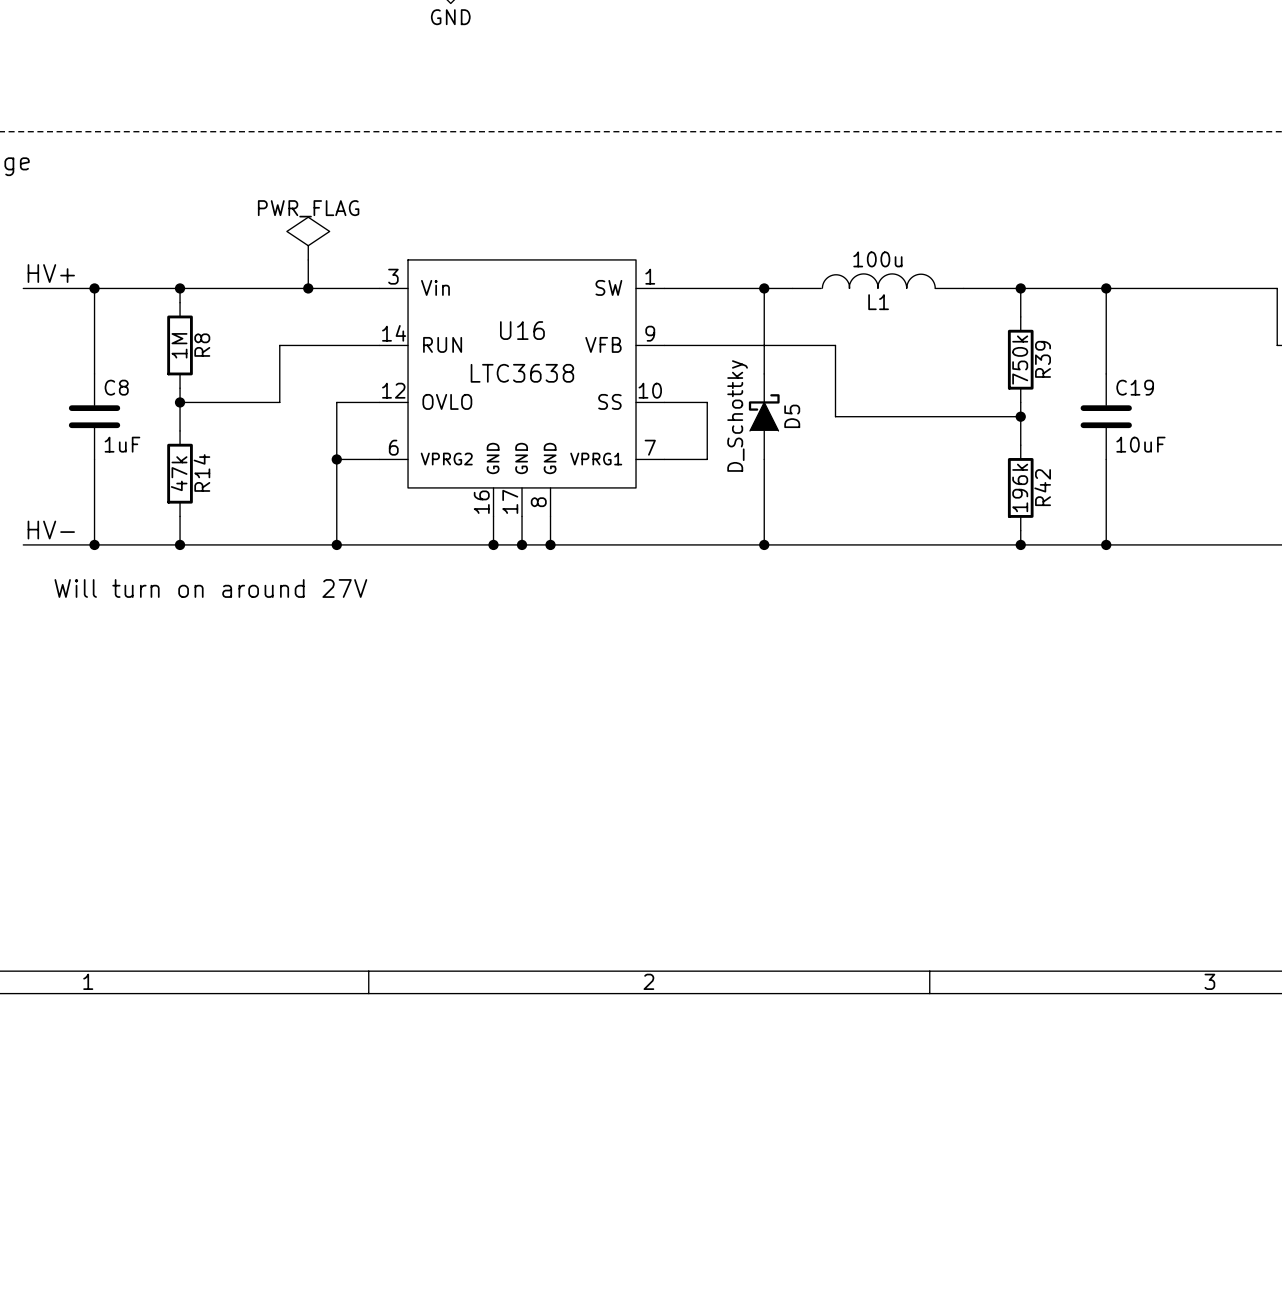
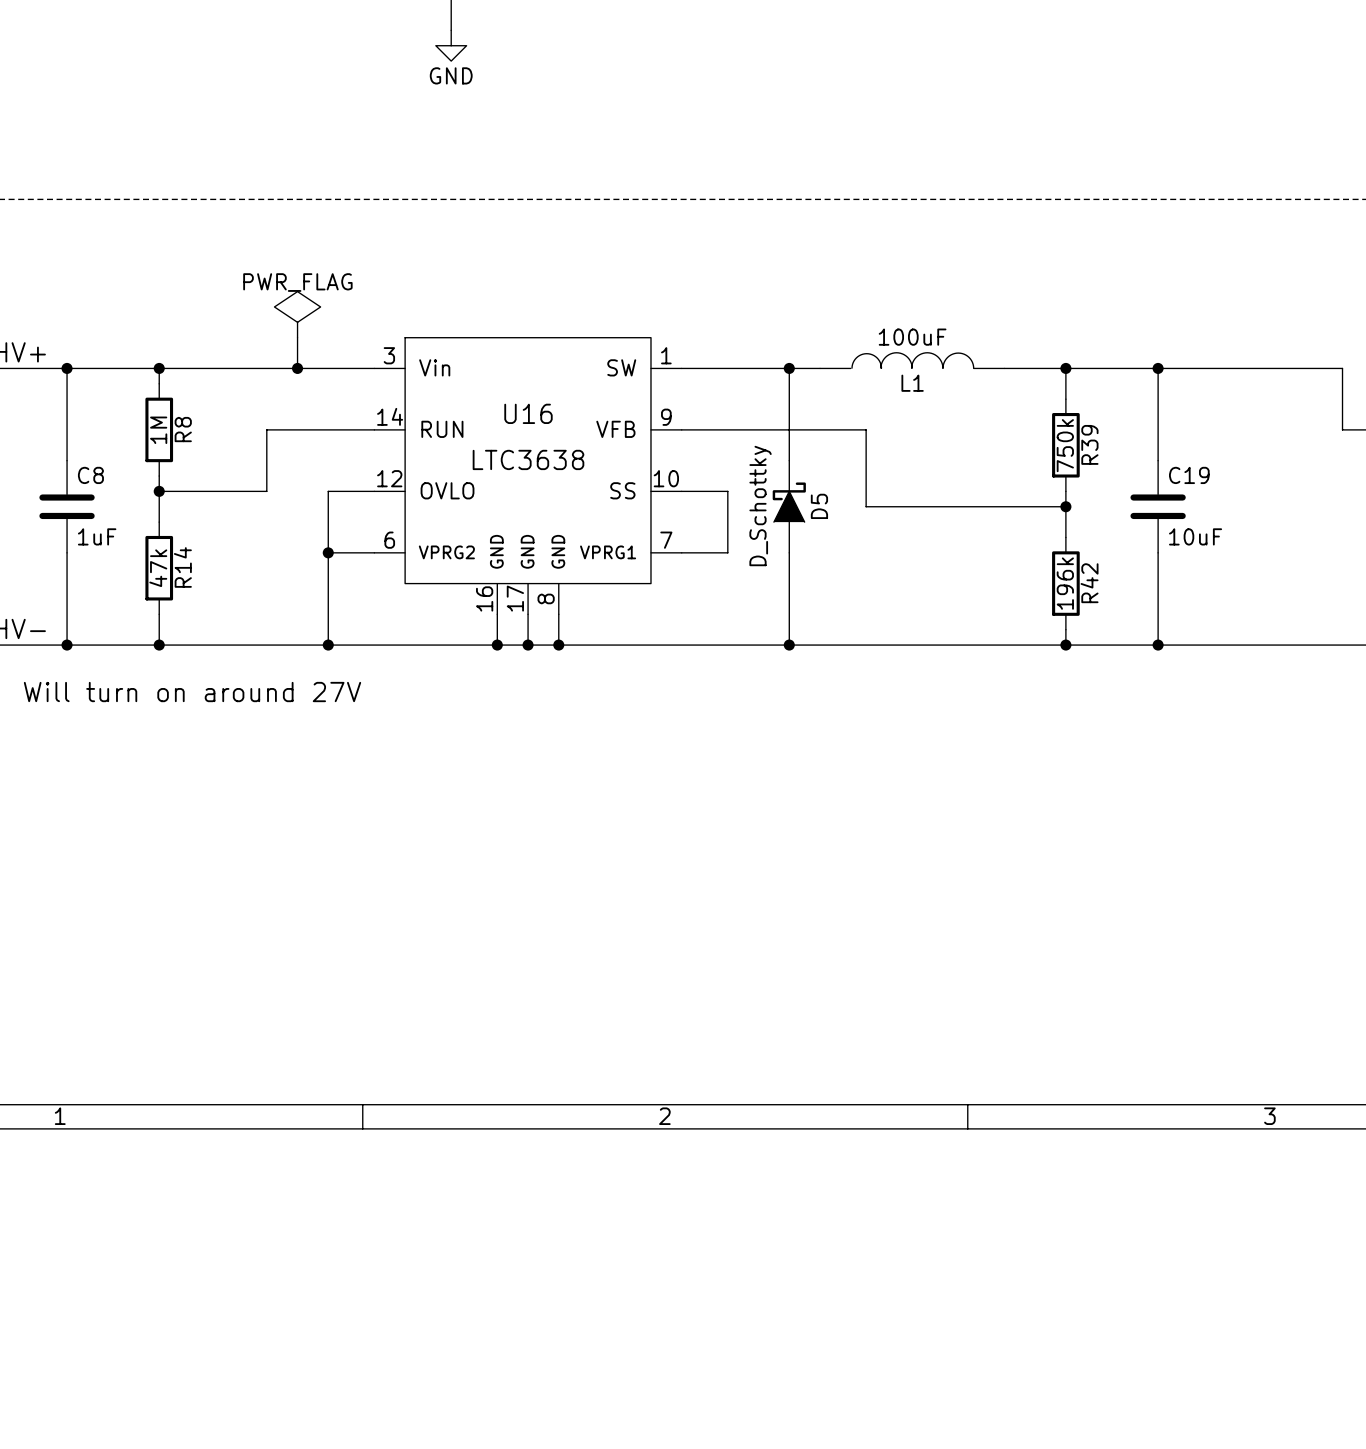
L1 value: 100u (877, 259) -> 100uF (912, 337)

